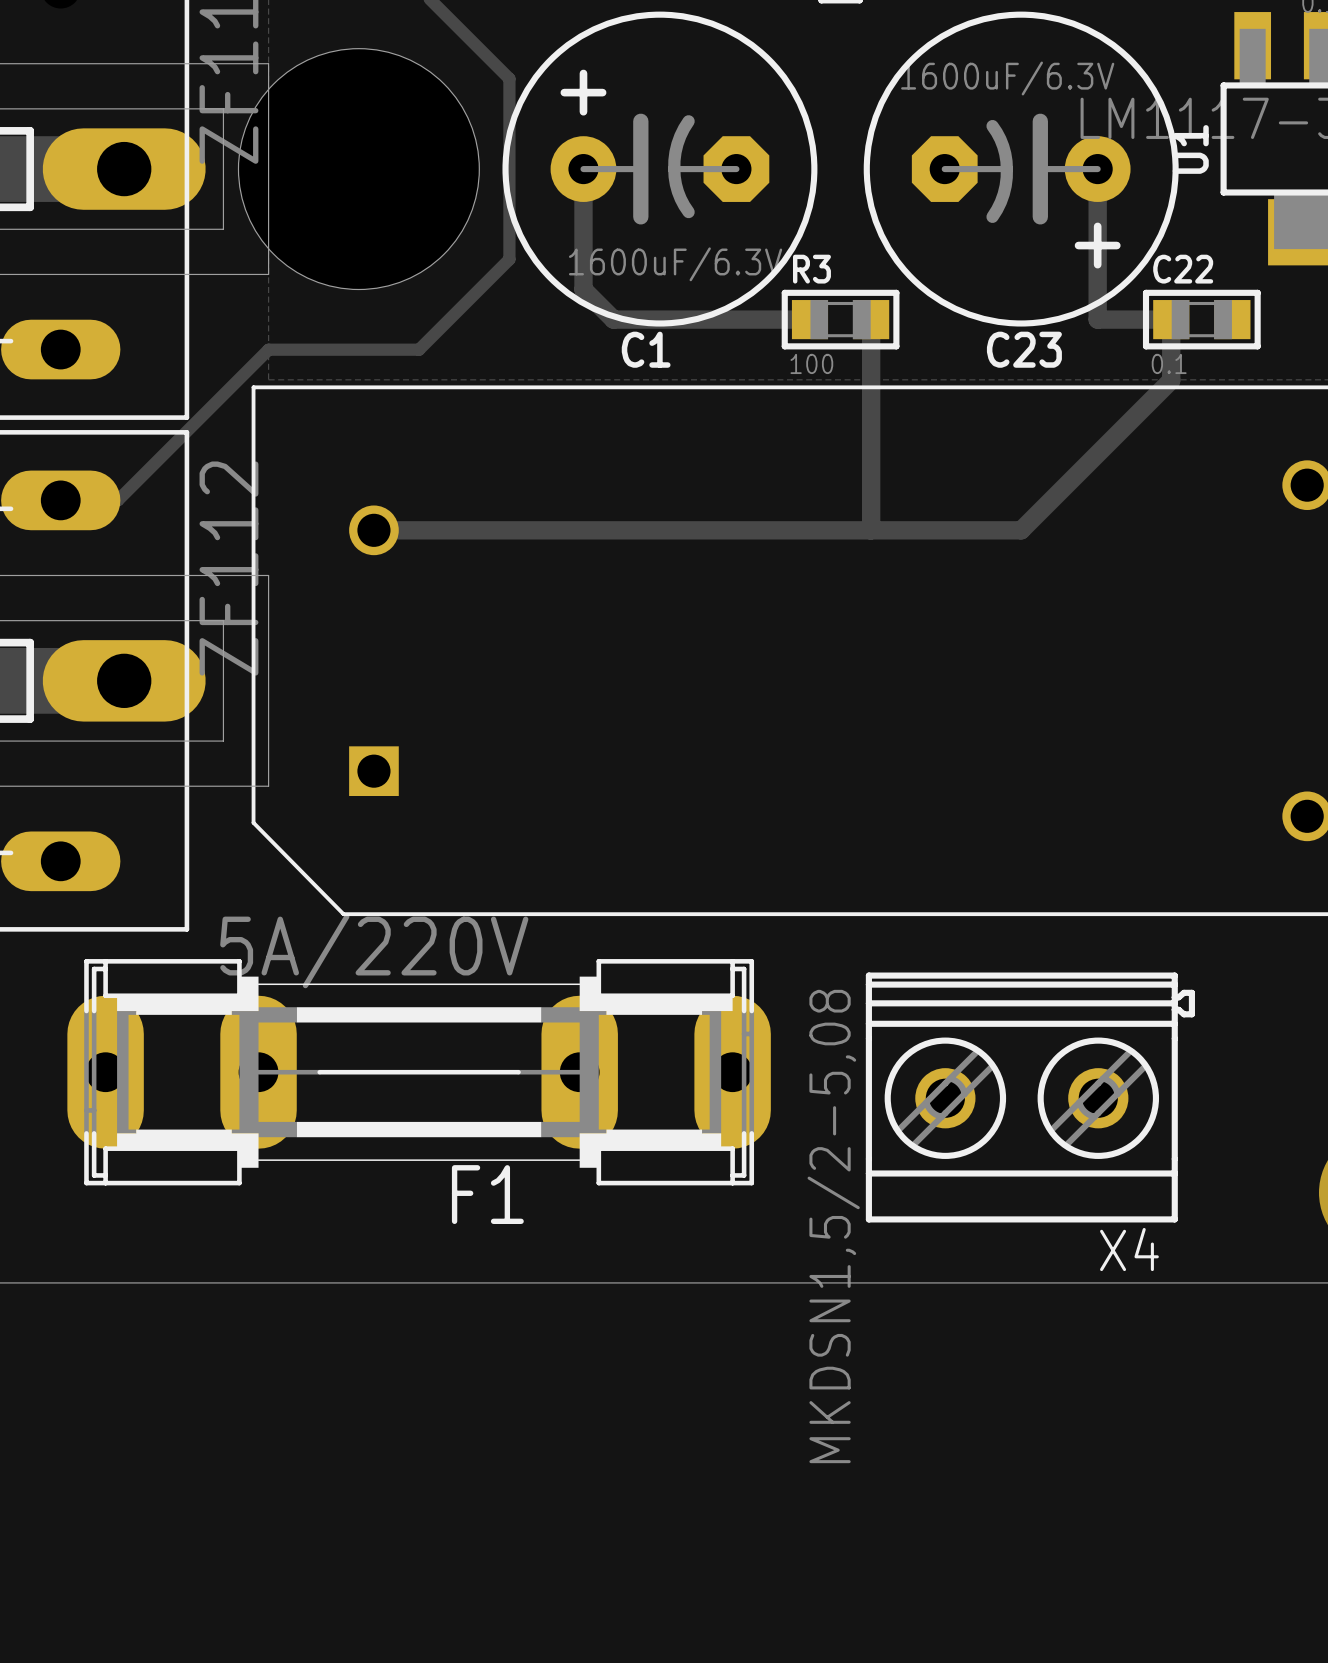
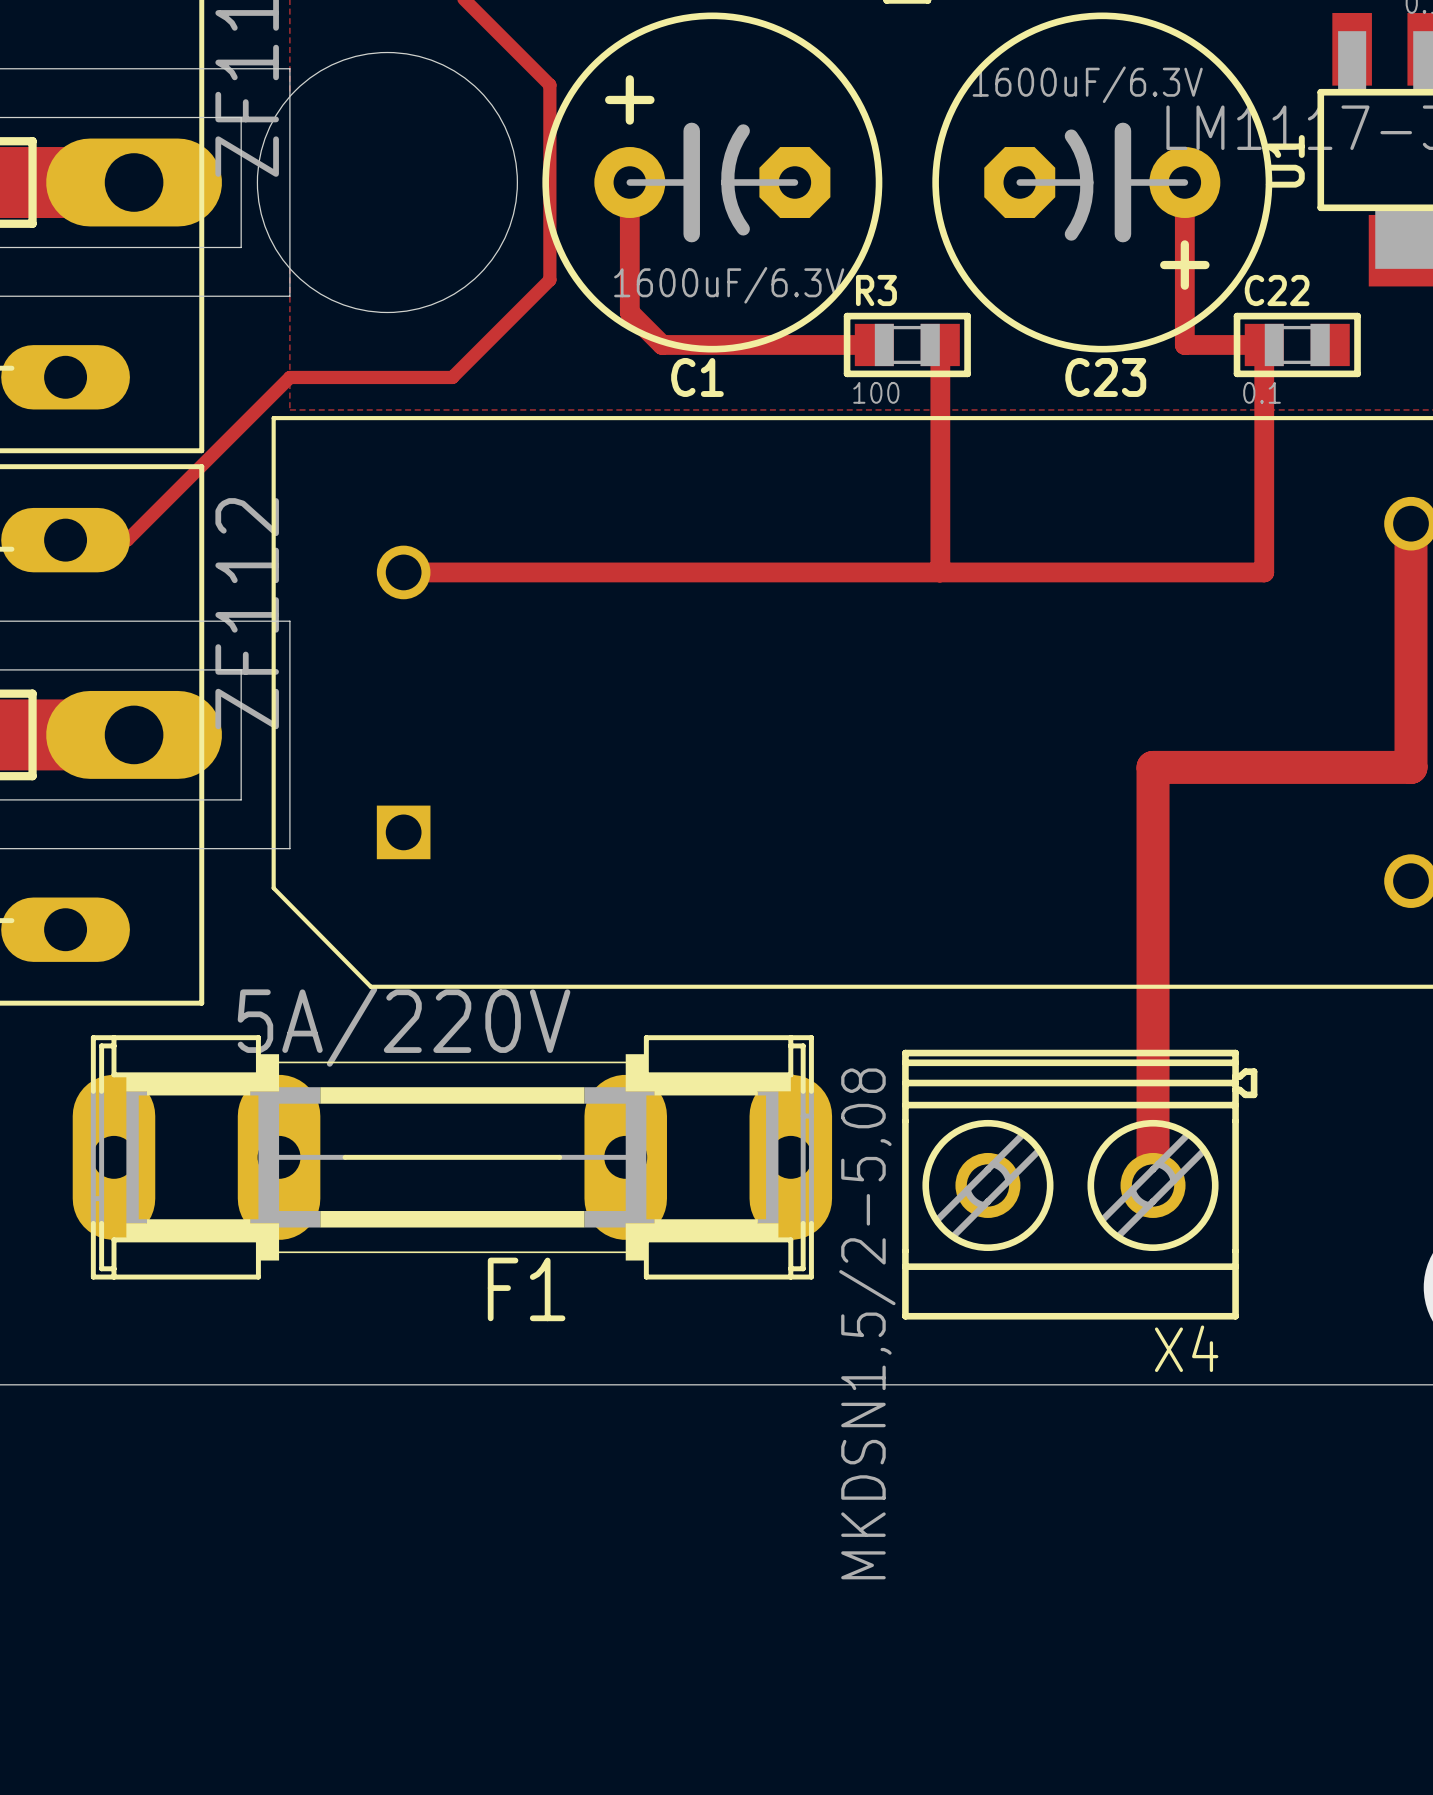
track: (1171, 380) (1021, 530) -> (1264, 410) (1264, 572) (1102, 572)
track: none -> (1411, 523) (1411, 767) (1153, 767) (1153, 1185)
X4 position: (1030, 1097) -> (1079, 1184)

